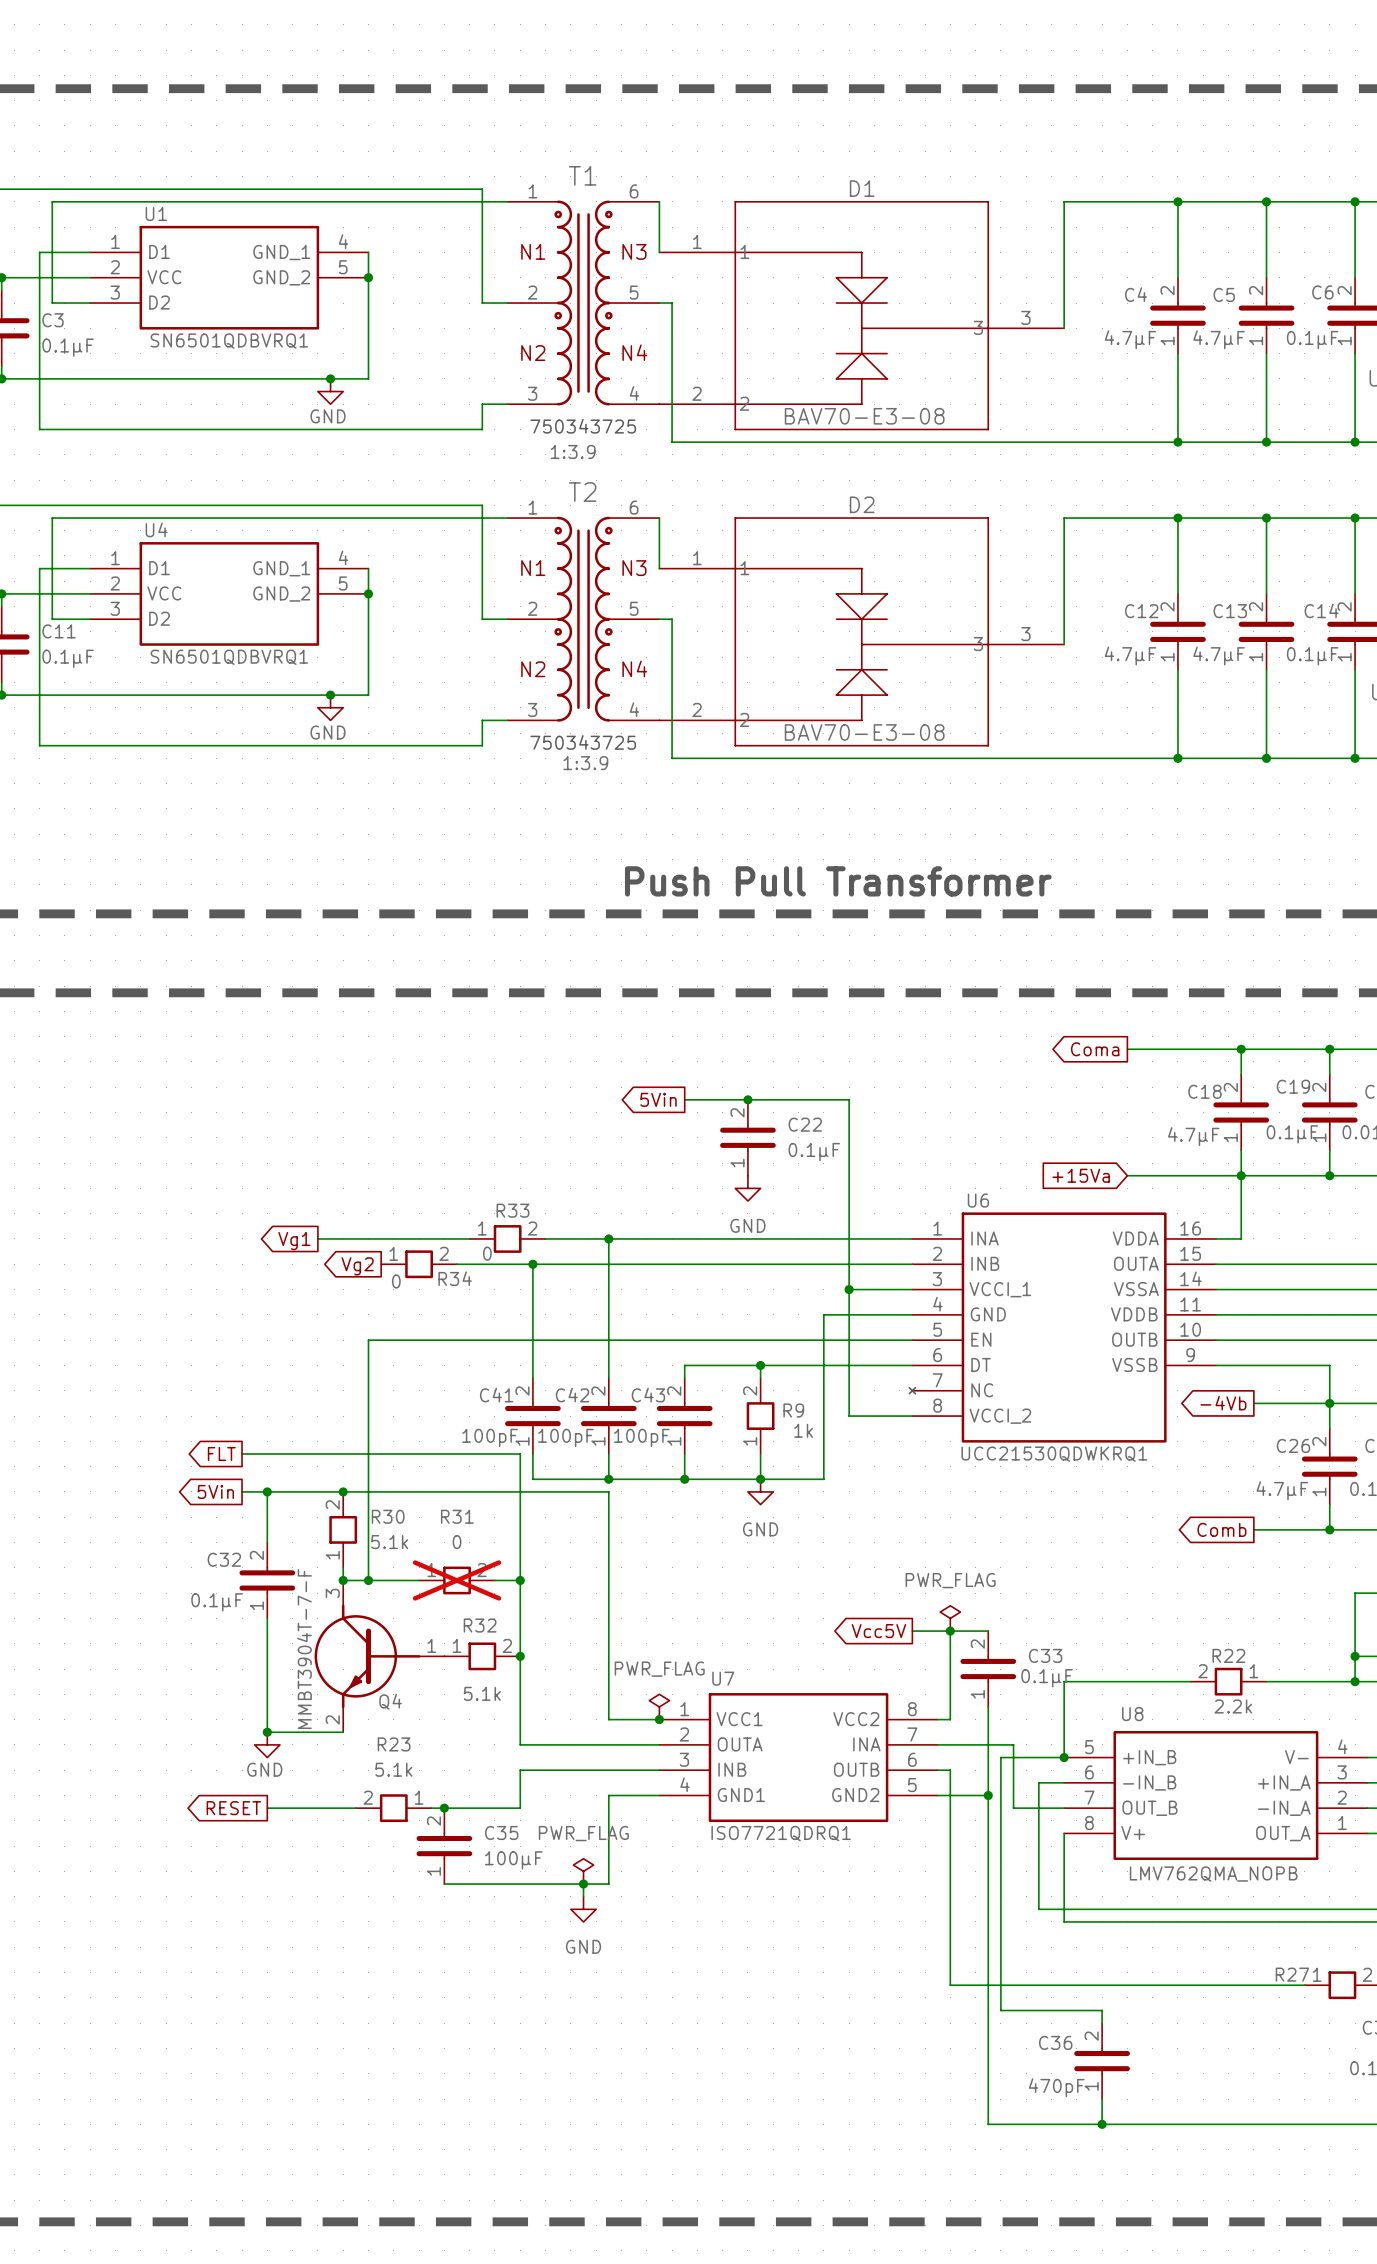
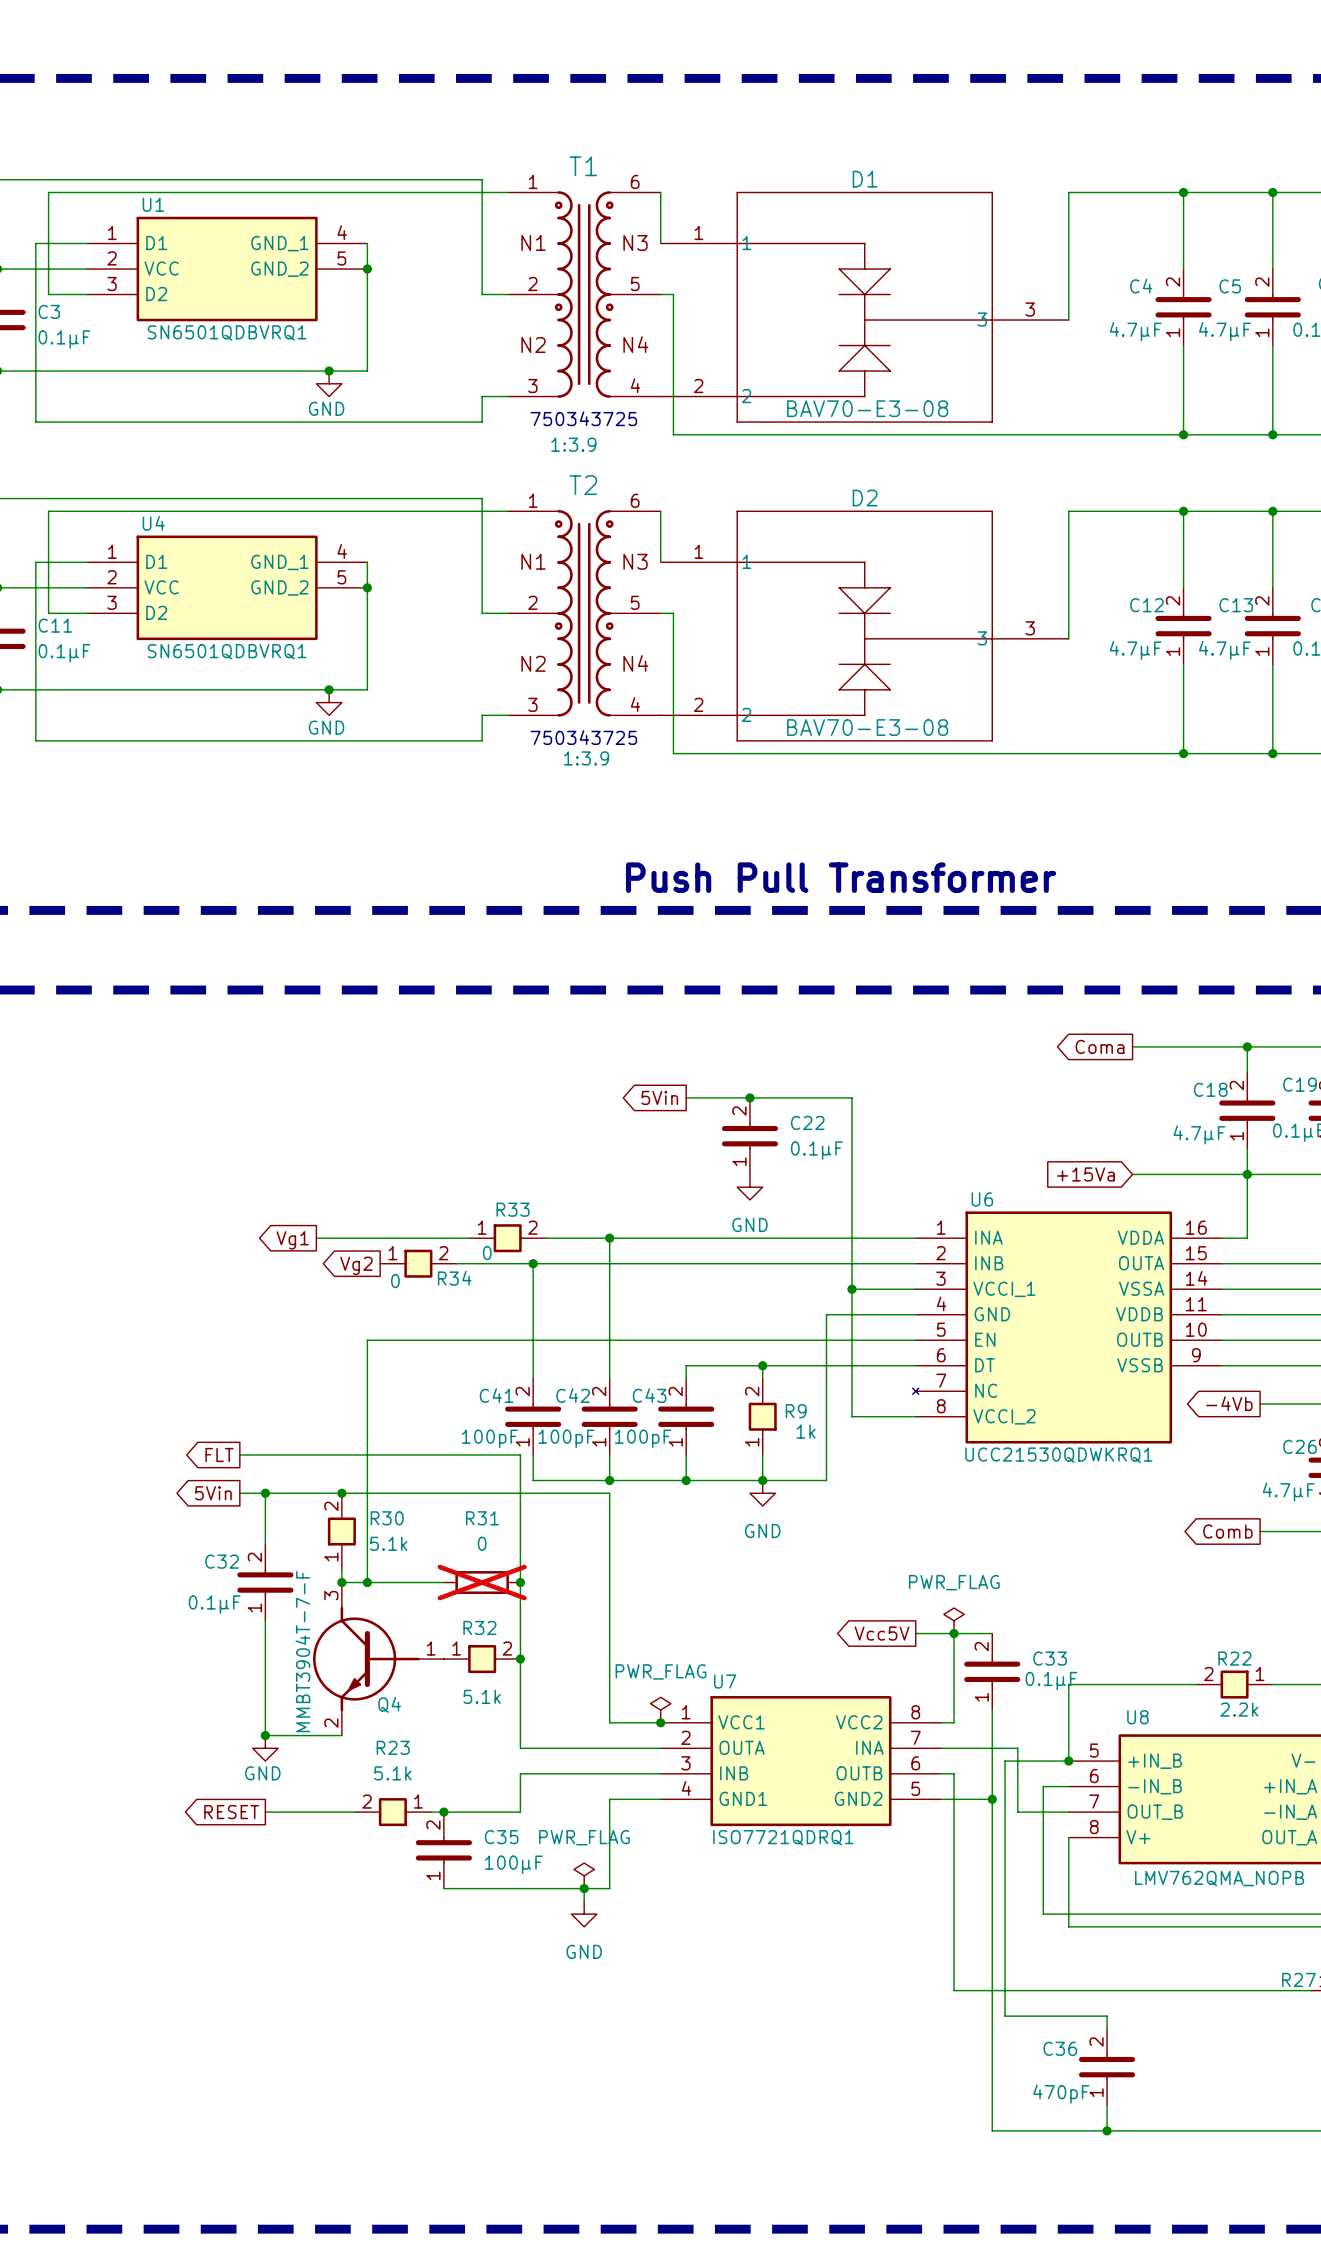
R31 symbol: [419, 1566, 495, 1595] -> [443, 1571, 521, 1595]

